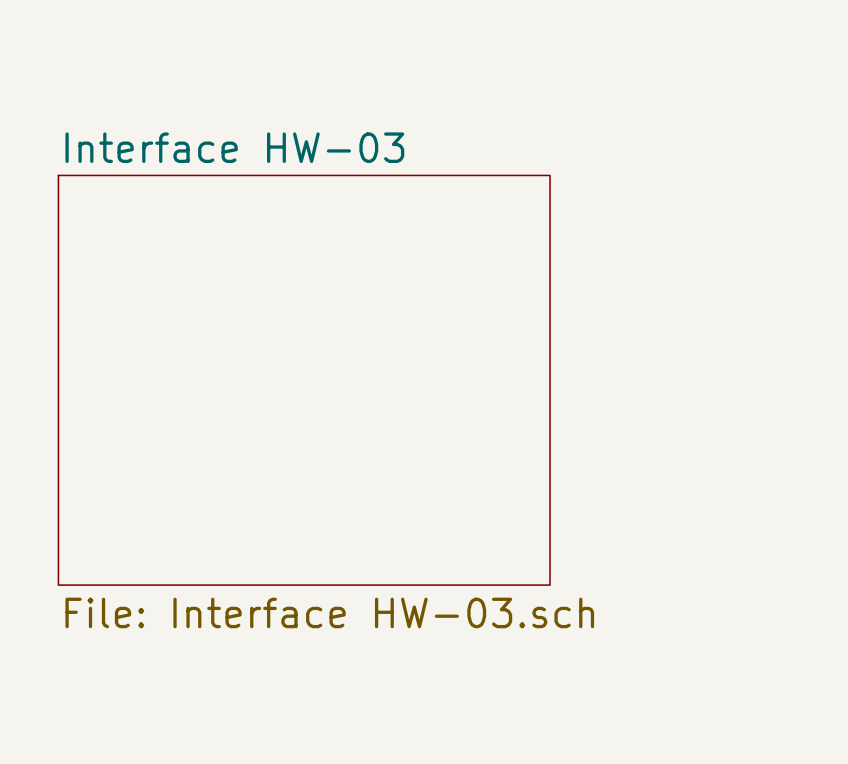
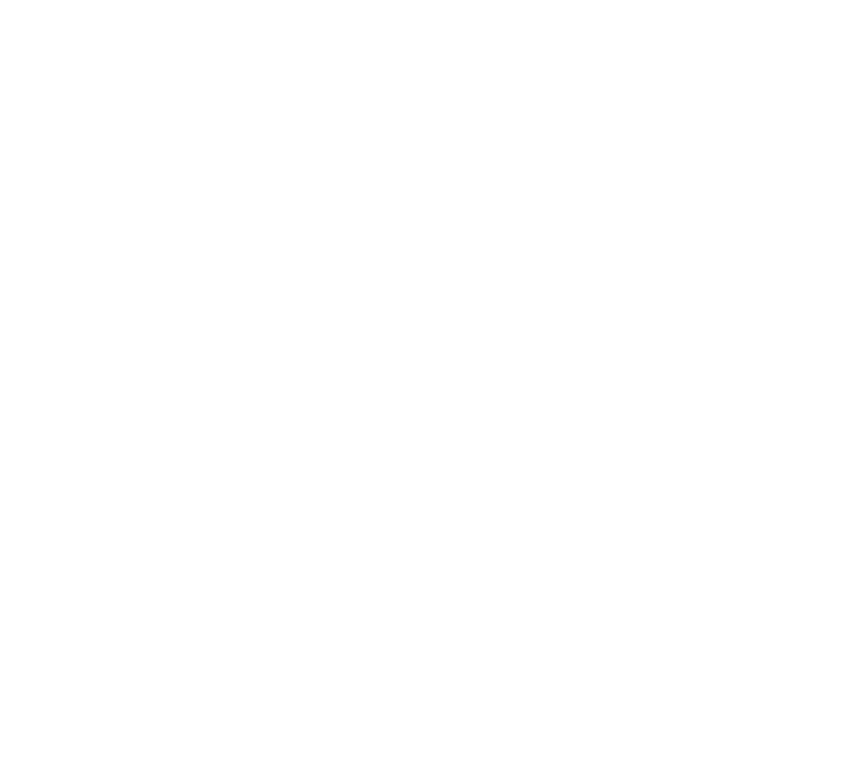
sheet Interface HW-03: File: Interface HW-03.sch (304, 380) -> none

